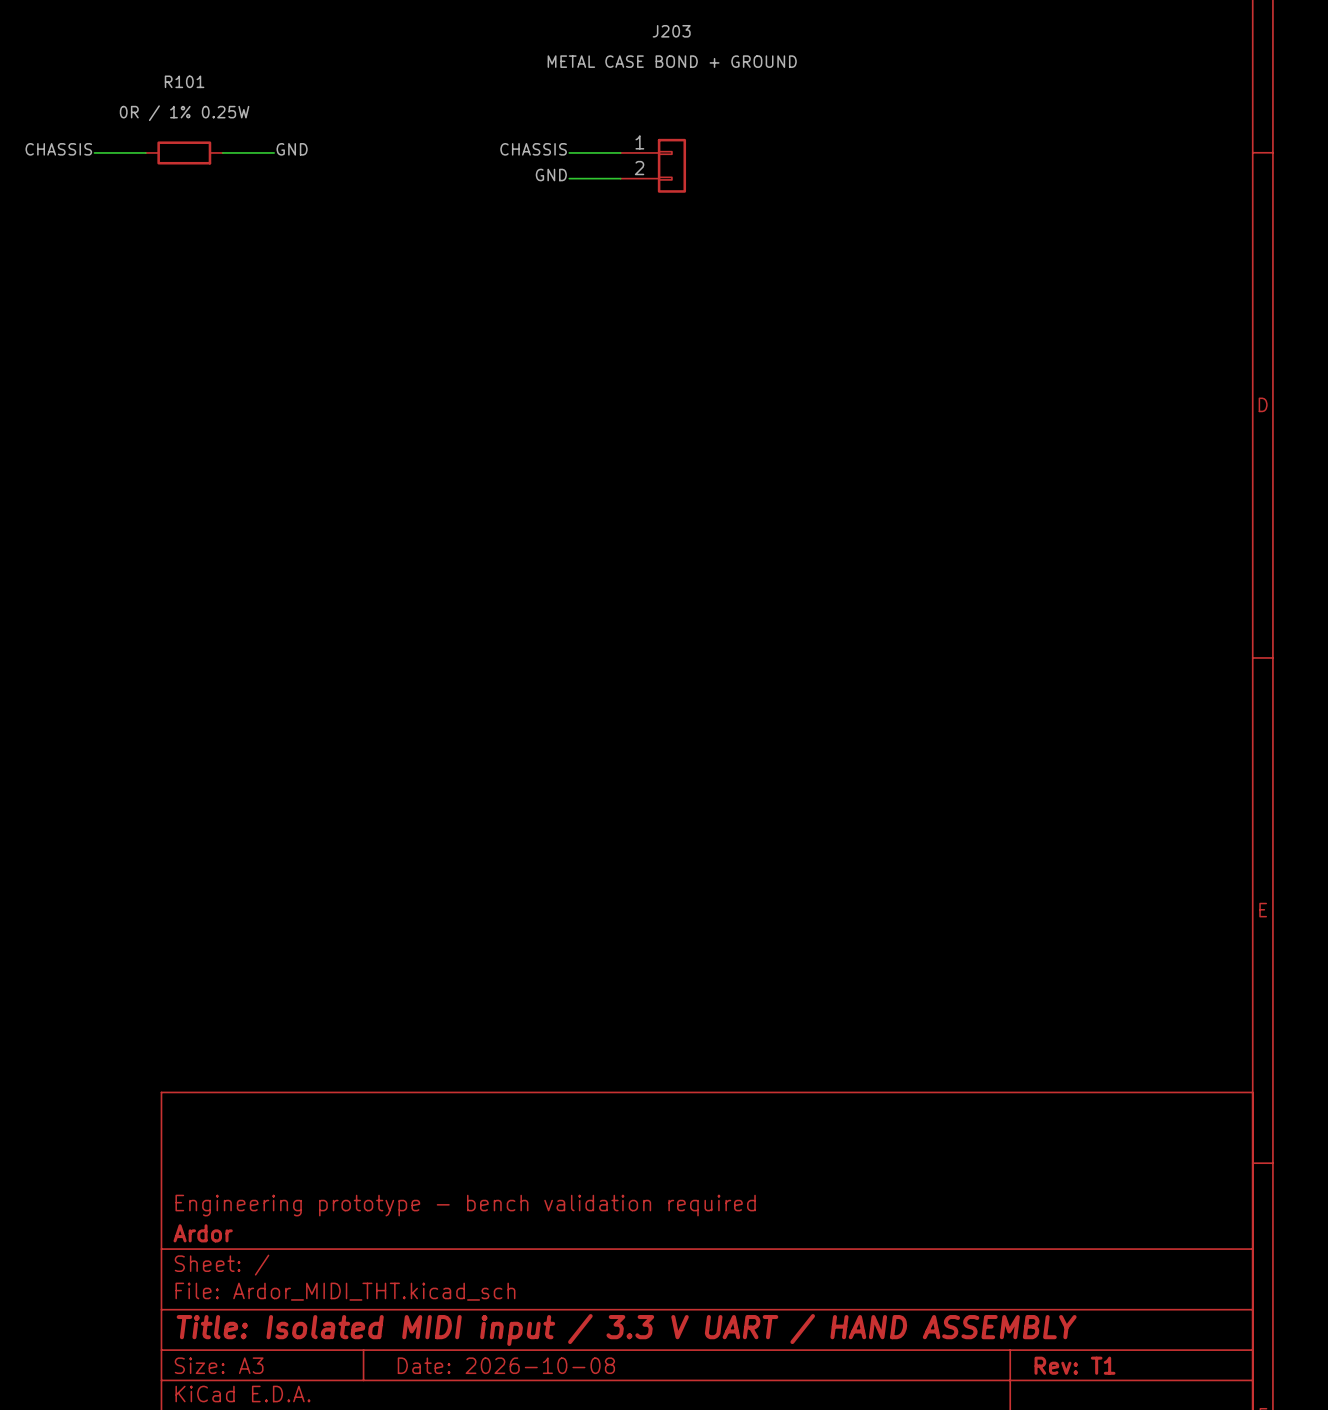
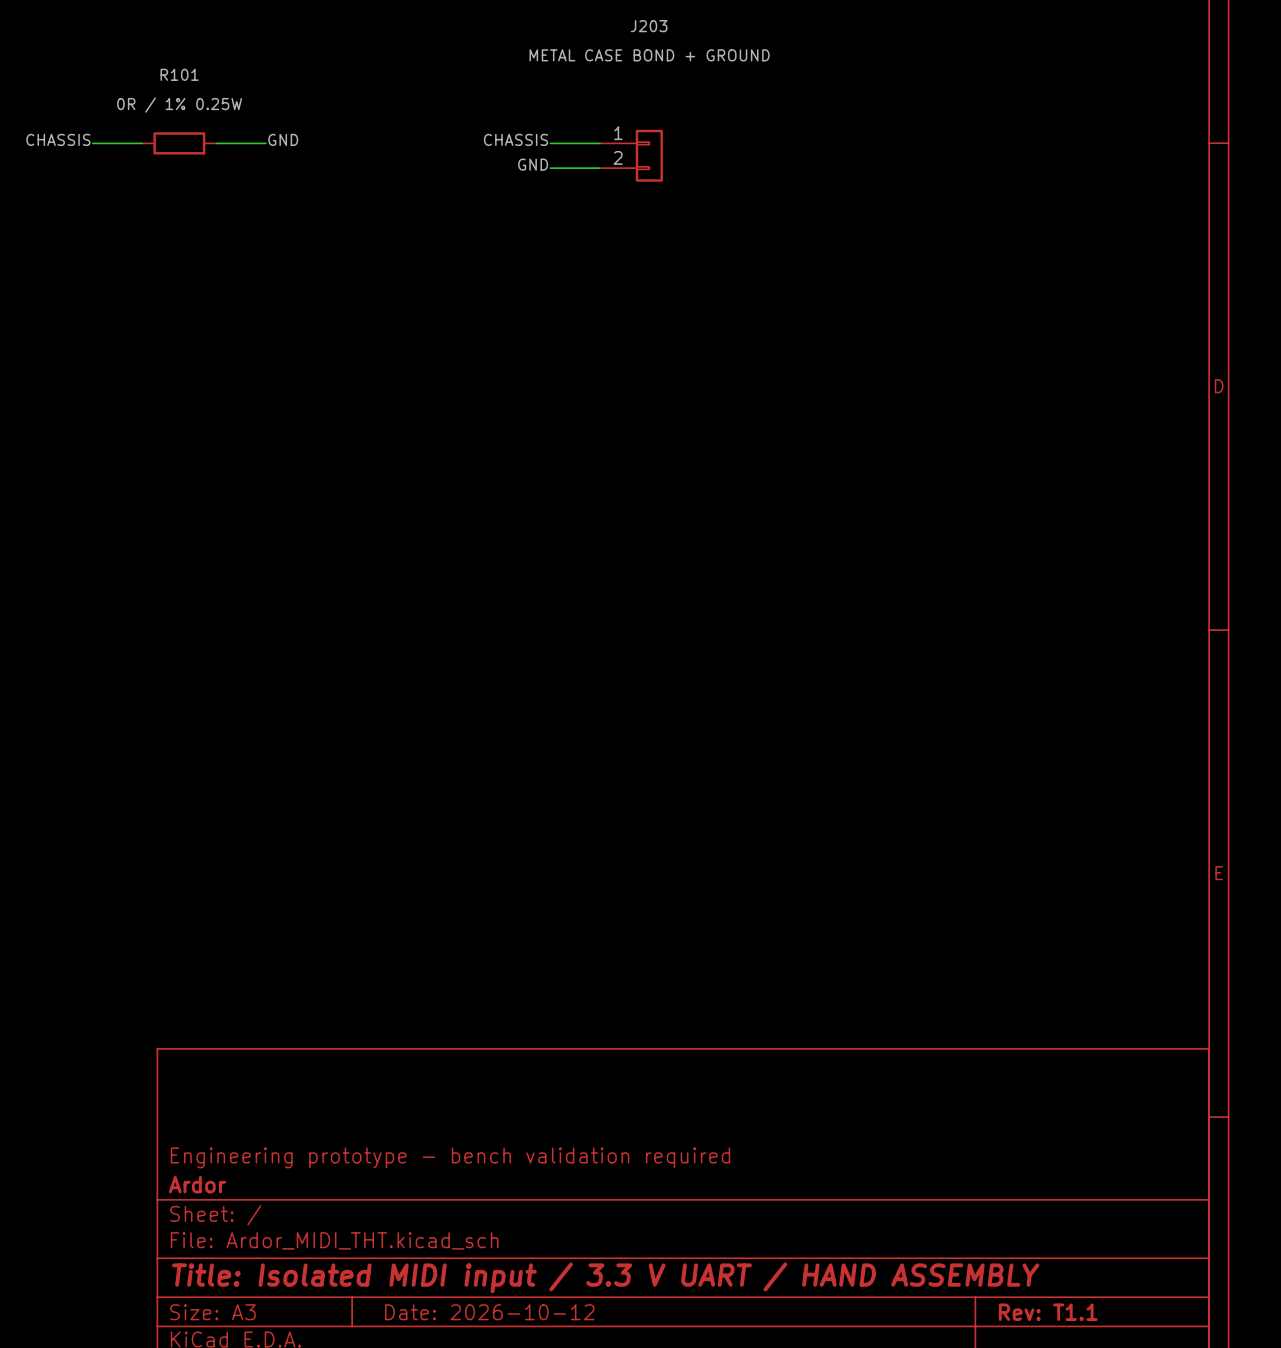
title block: Date: 2026-10-08 (506, 1365) -> Date: 2026-10-12 (489, 1312)
title block: Rev: T1 (1075, 1365) -> Rev: T1.1 (1048, 1312)

